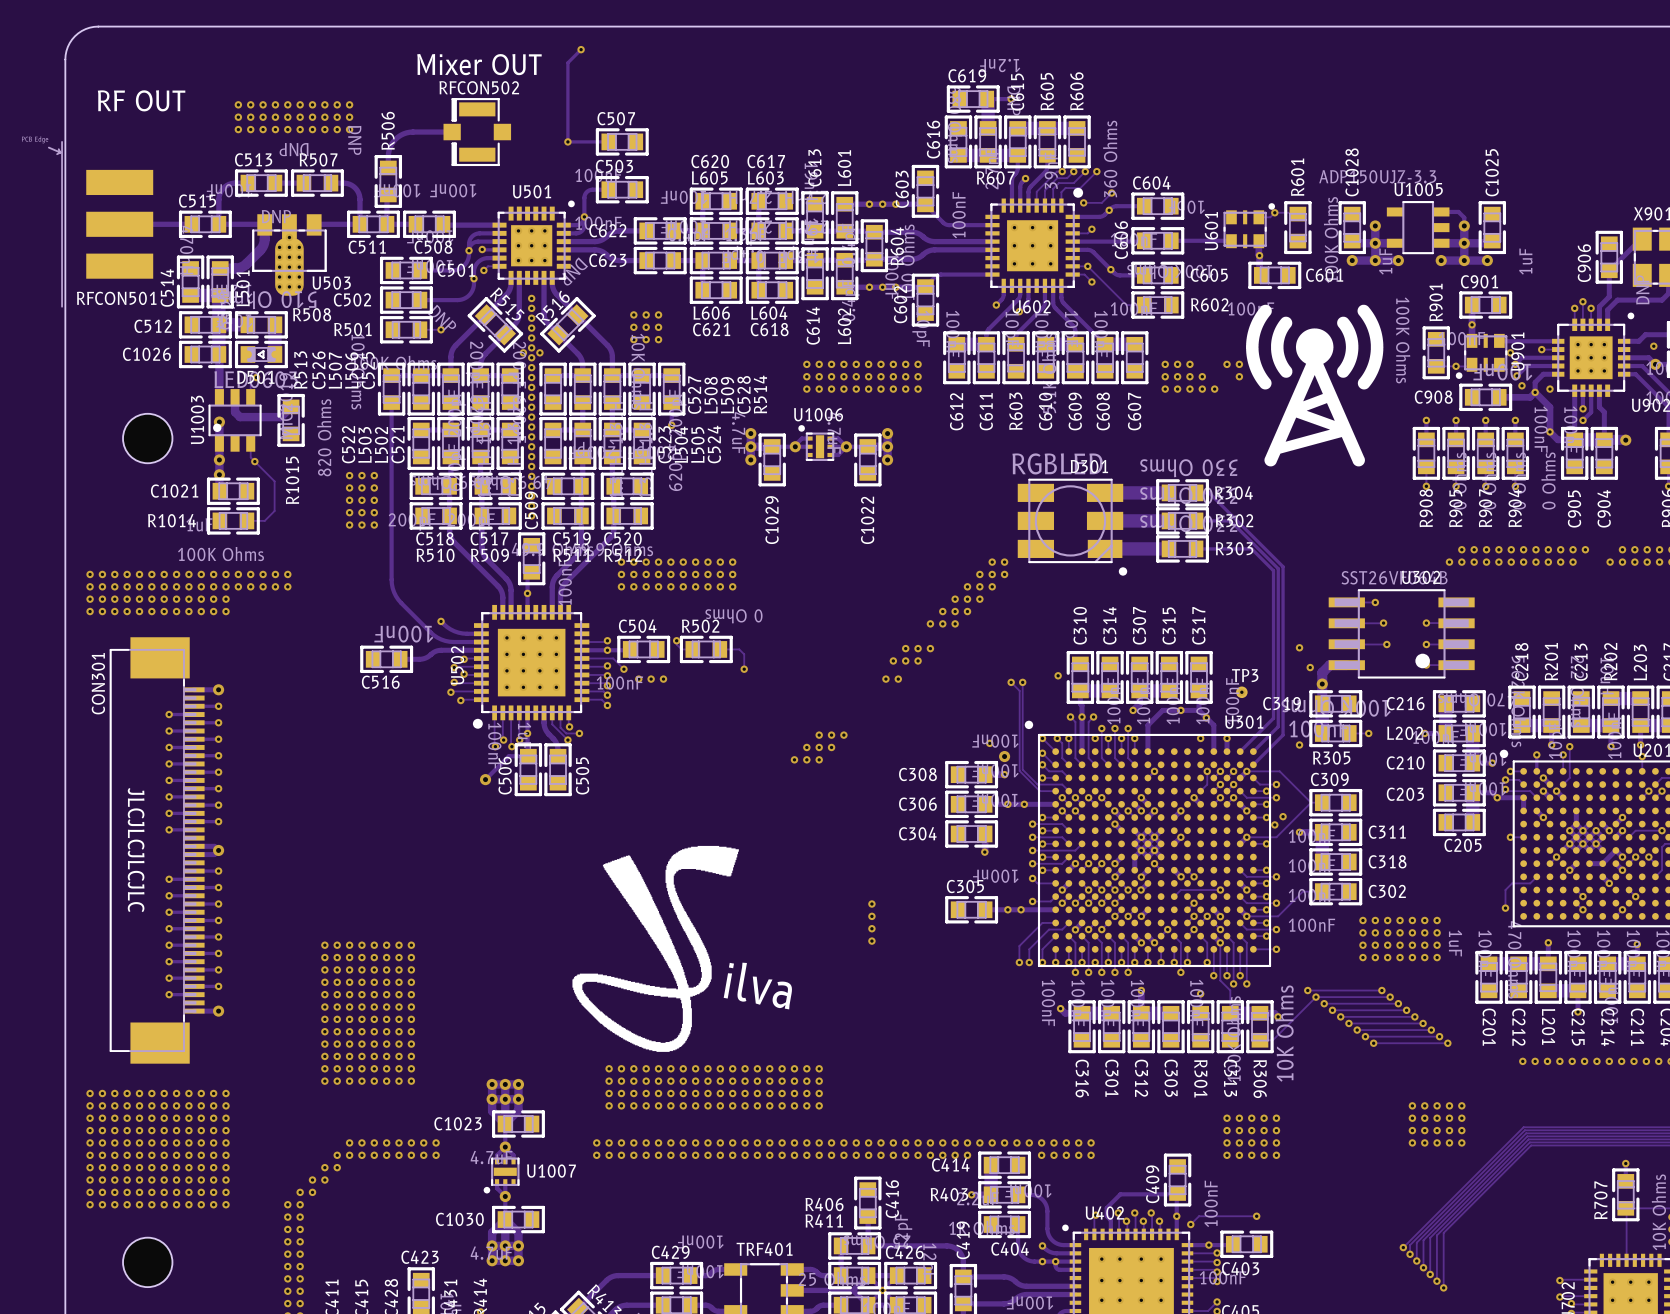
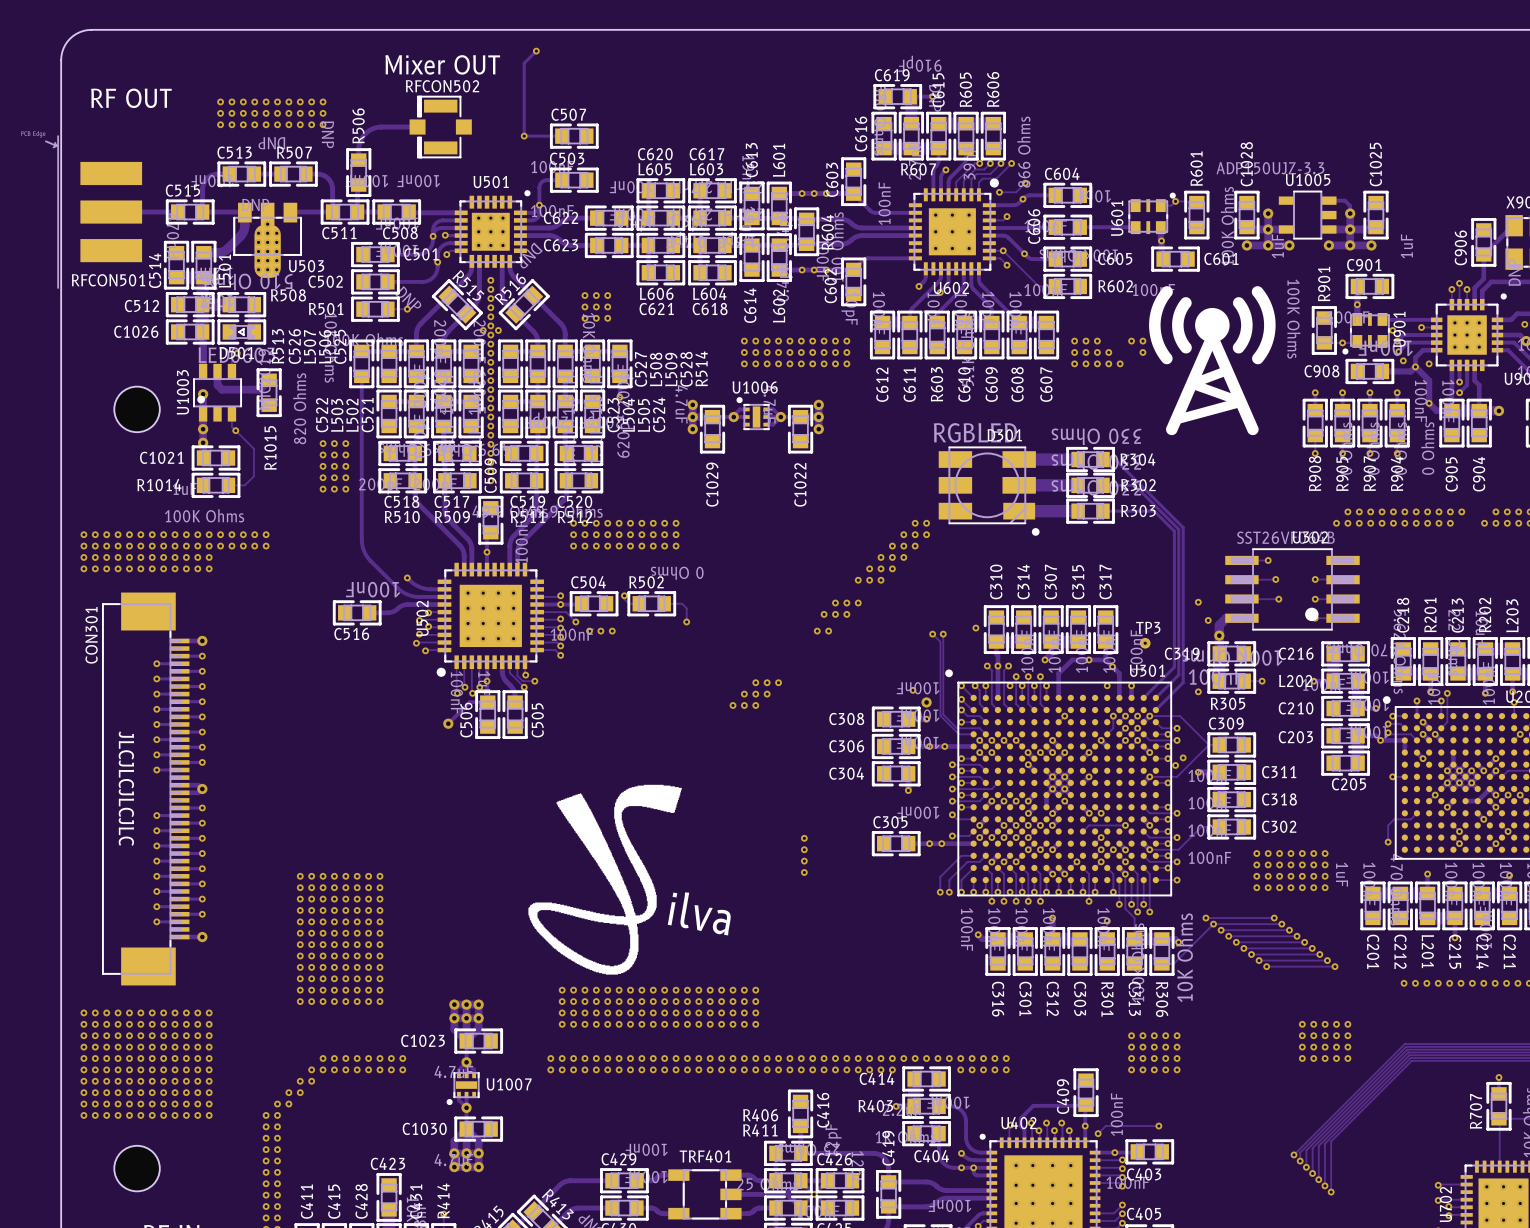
C619 value: 1.2nF (999, 65) -> 910pF (919, 63)
R606 value: 360 Ohms (1110, 159) -> 866 Ohms (1023, 152)

